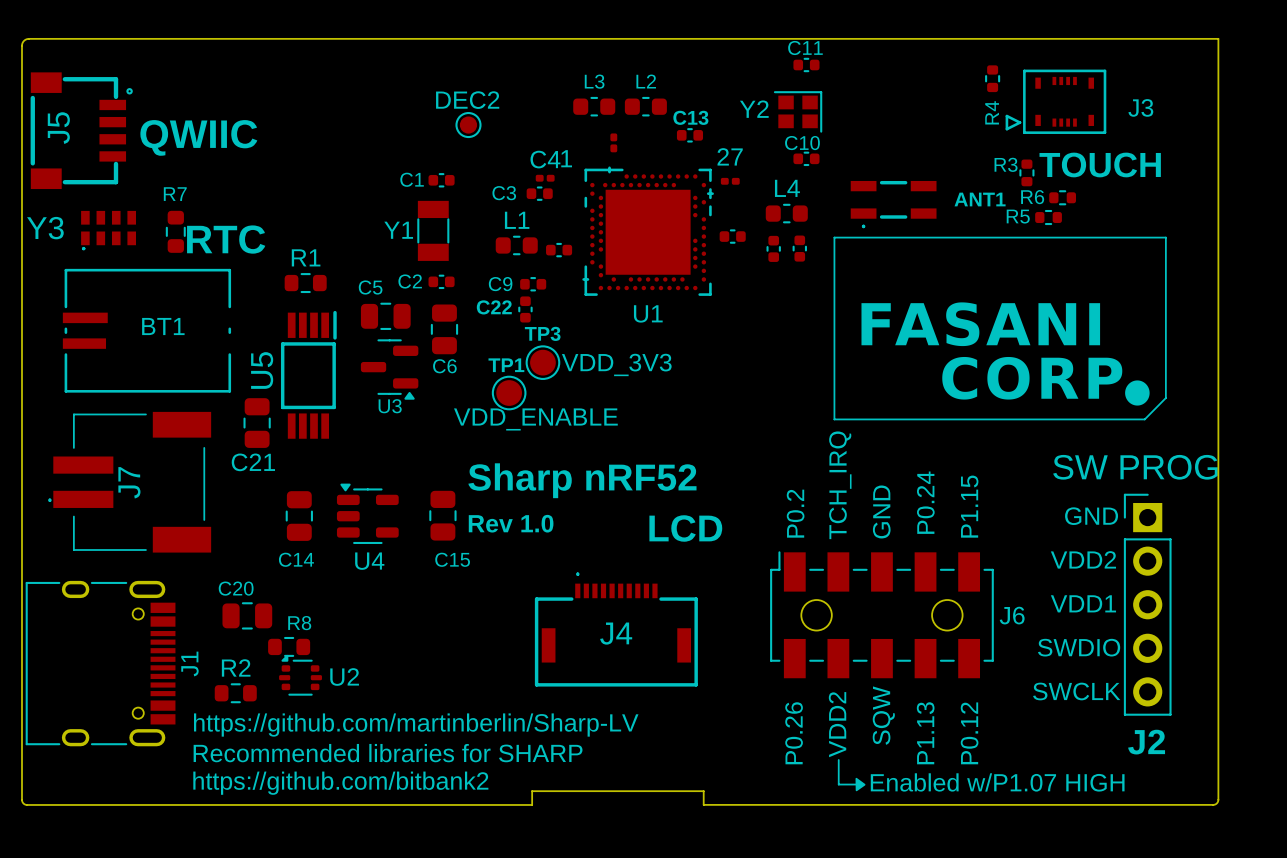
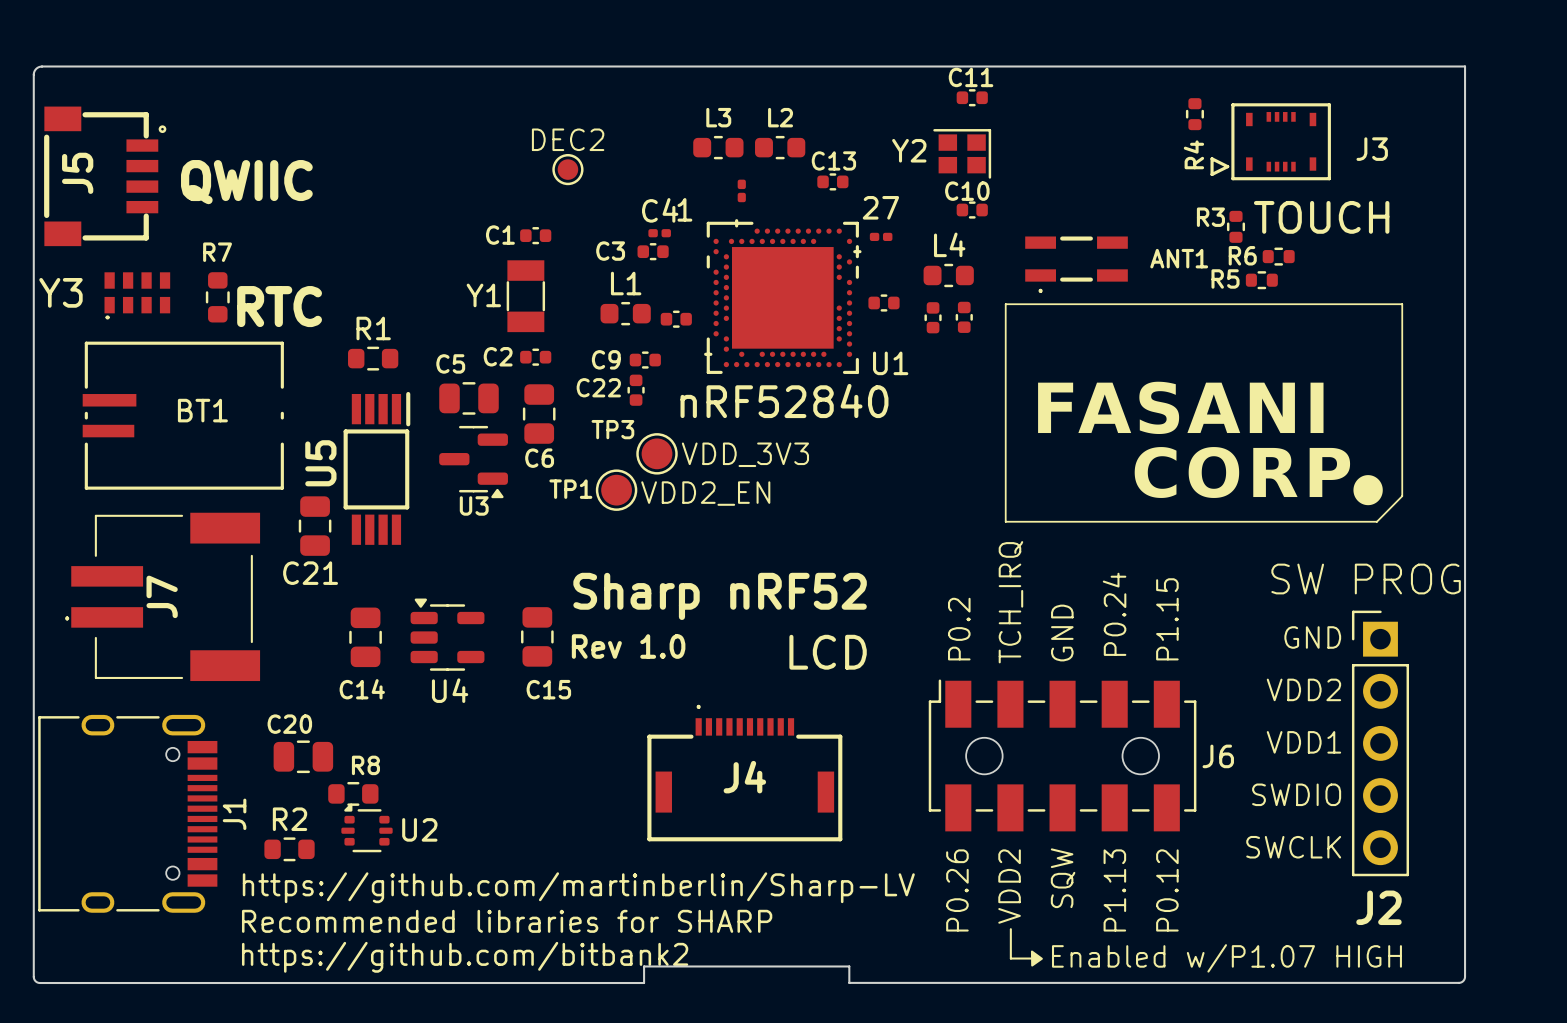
U1 name position: U1 (648, 313) -> U1 (890, 363)
text: none -> nRF52840 (784, 400)
TP3 name position: TP3 (542, 333) -> TP3 (612, 429)
TP1 name position: TP1 (506, 365) -> TP1 (570, 489)
text: VDD_ENABLE (535, 419) -> VDD2_EN (705, 493)

